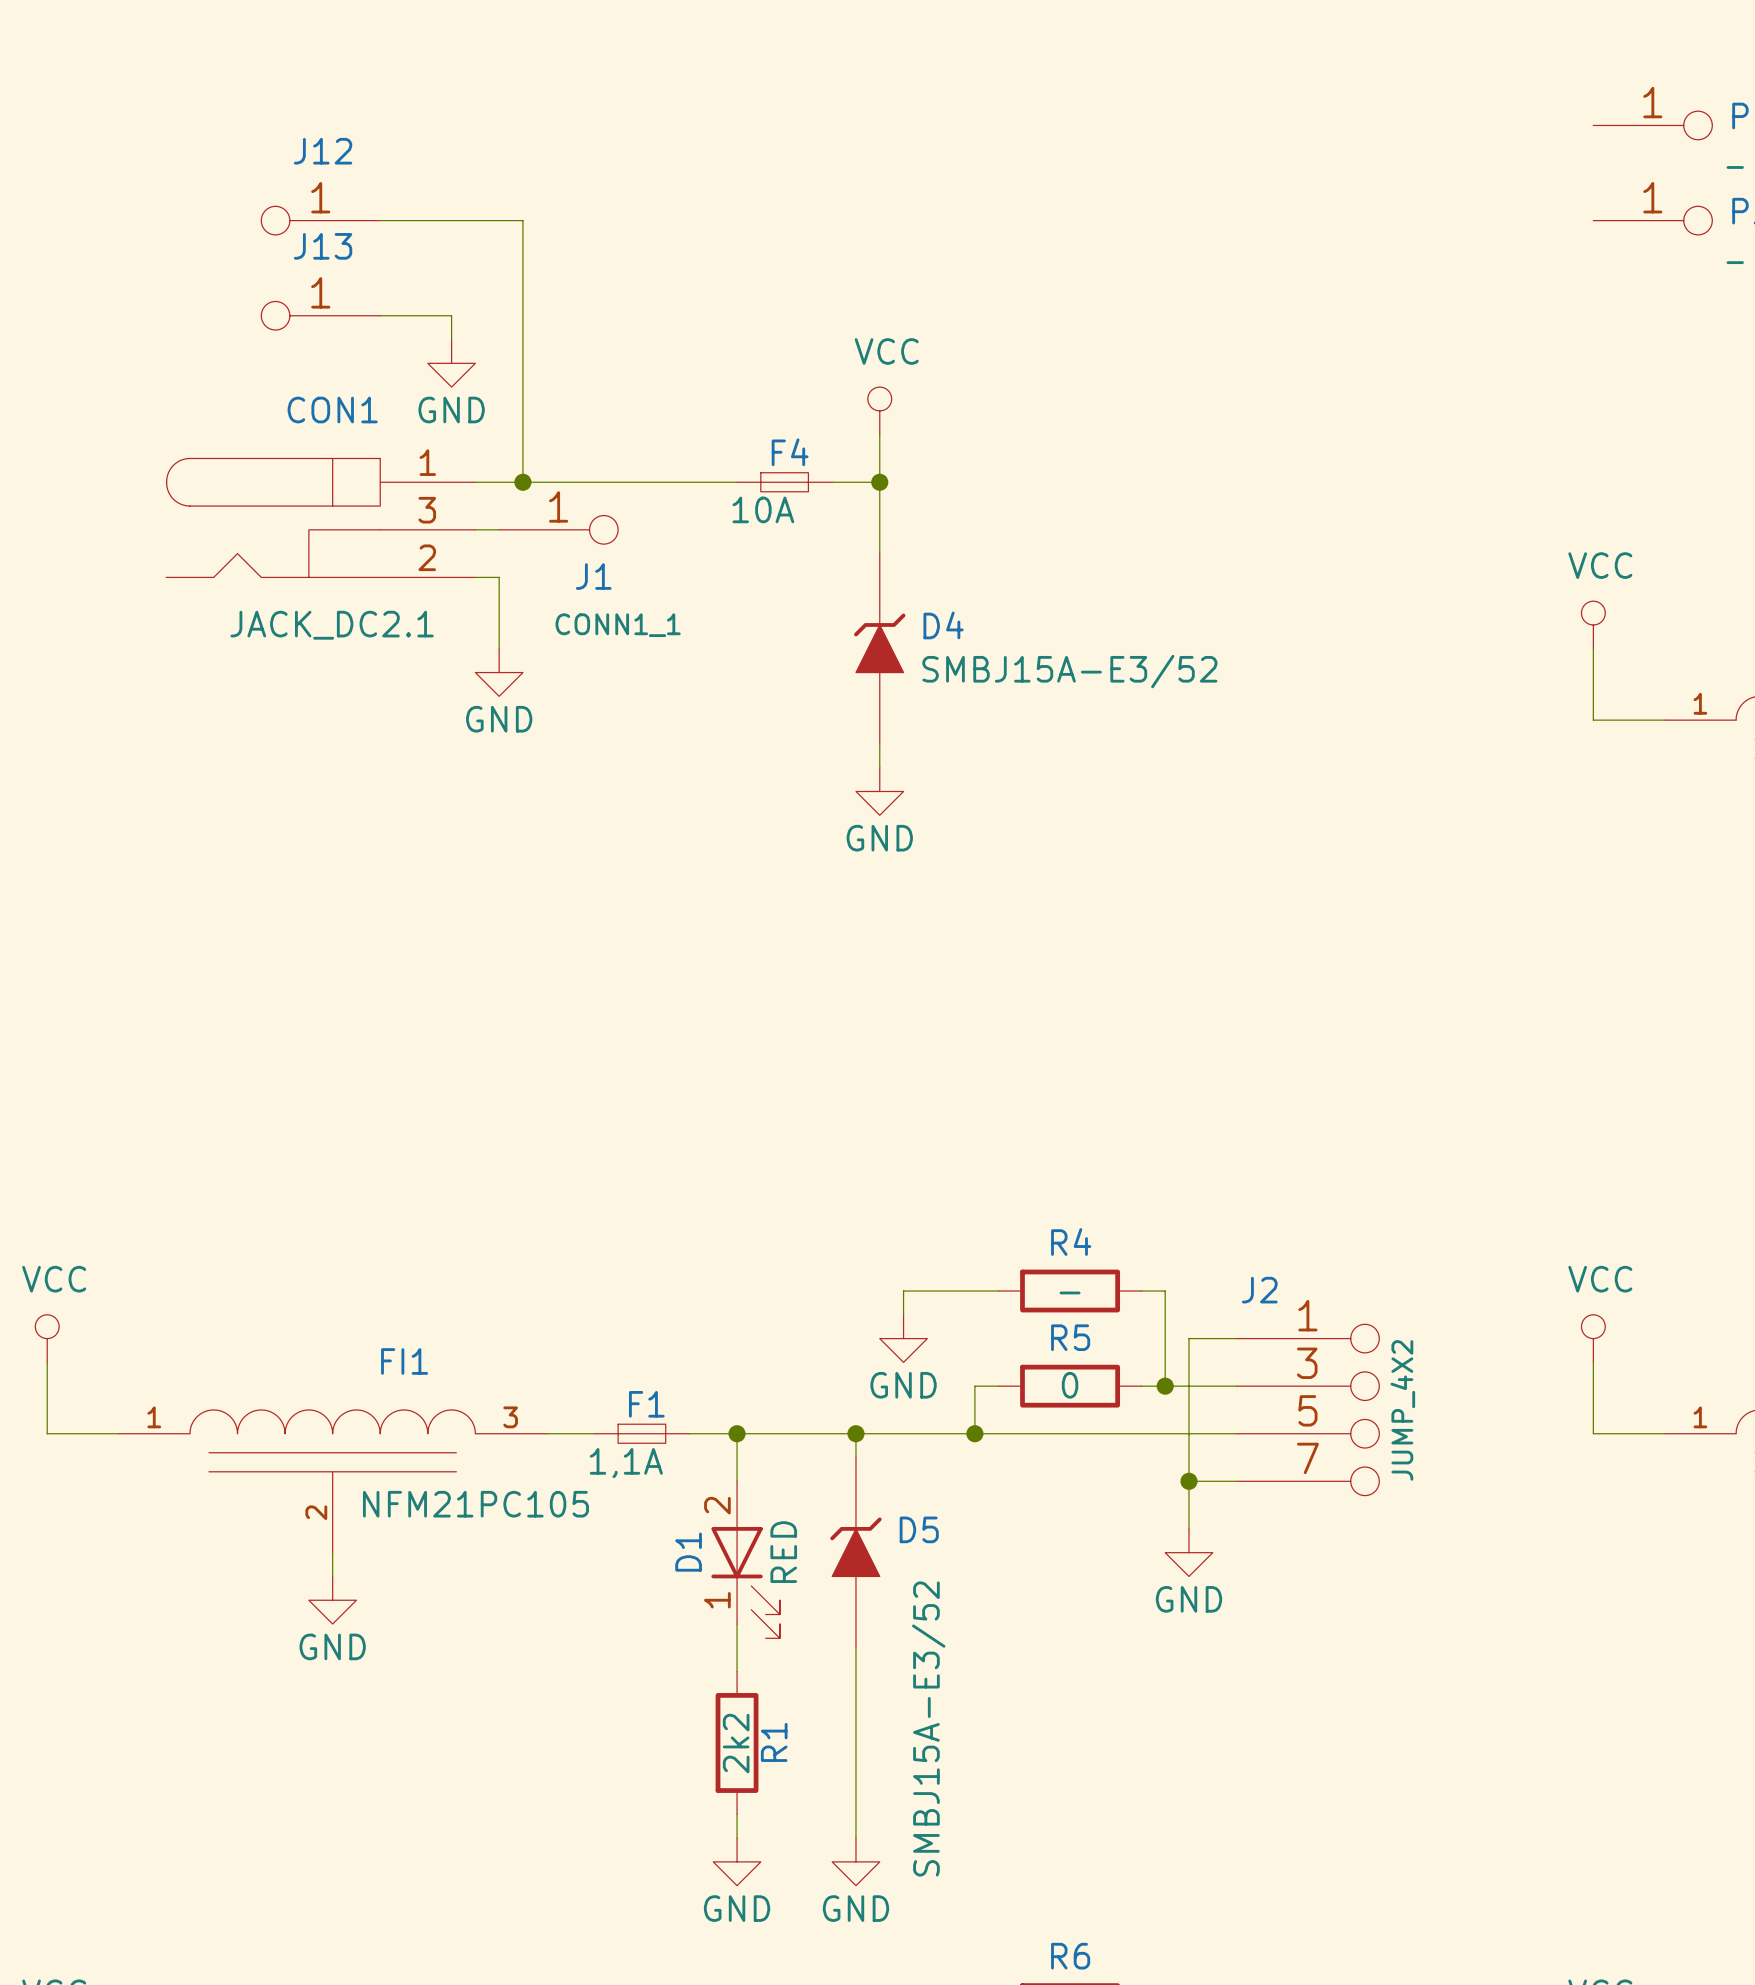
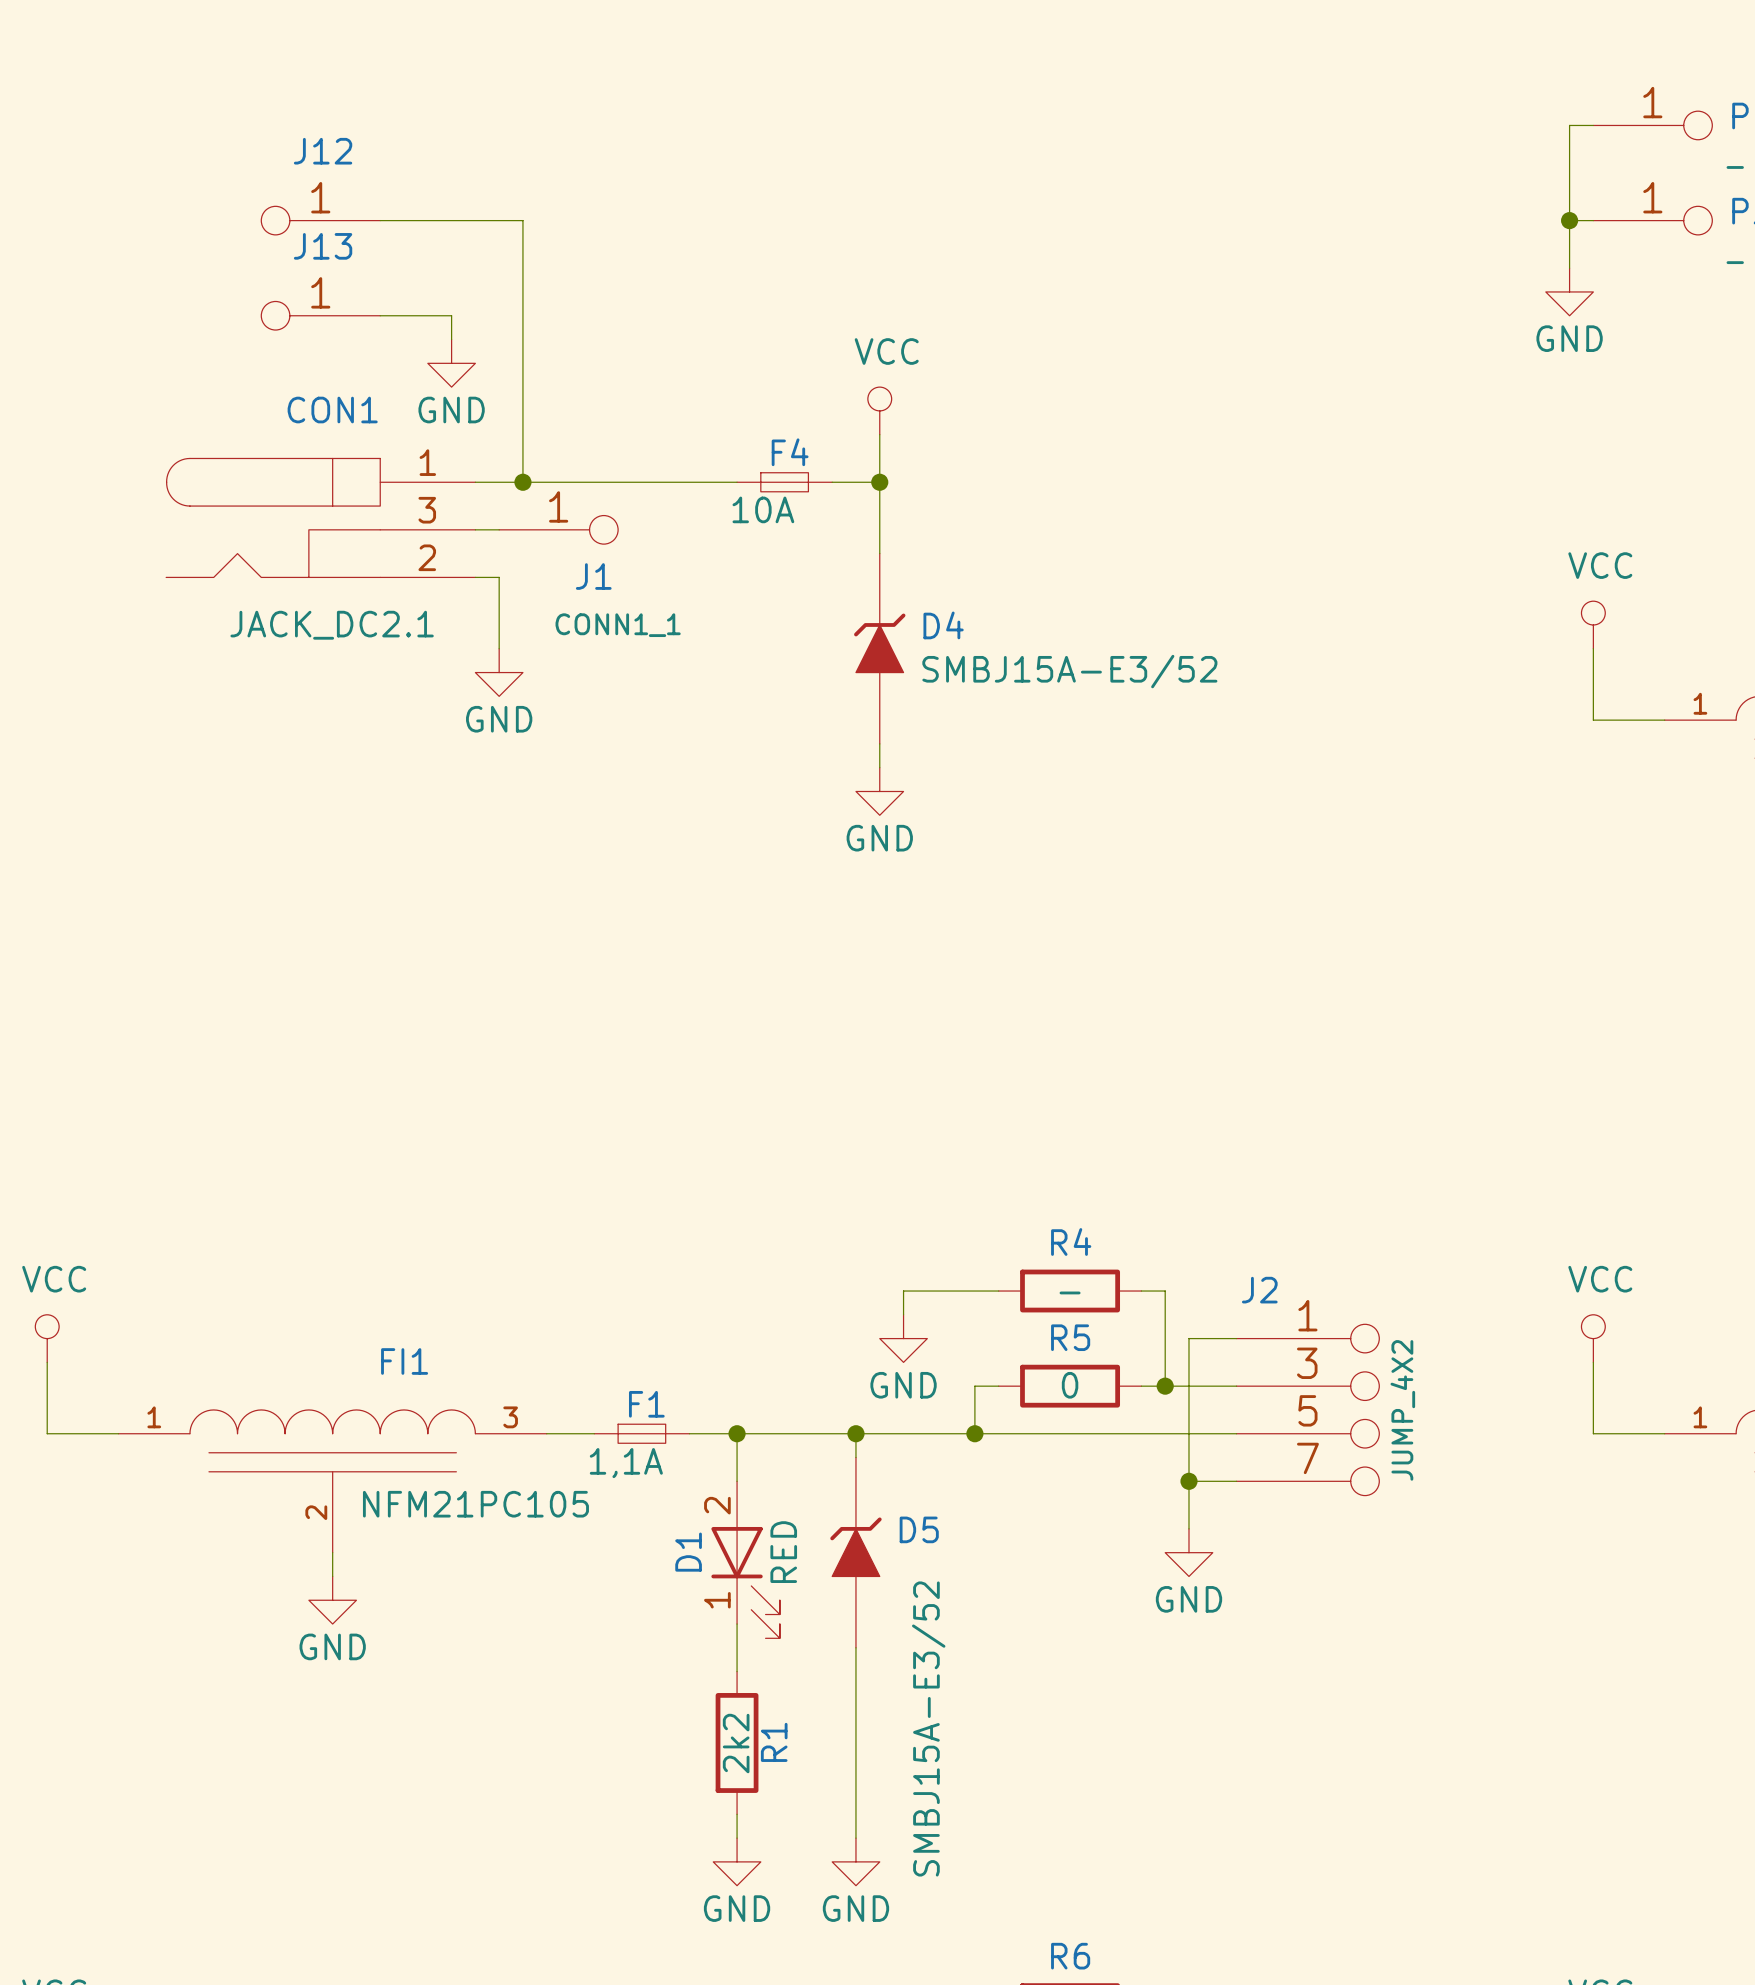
wire: none -> (1593, 125) (1569, 125) (1569, 268)
wire: none -> (1569, 220) (1593, 220)
junction: none -> (1569, 220)
power symbol: none -> GND (1569, 291)

